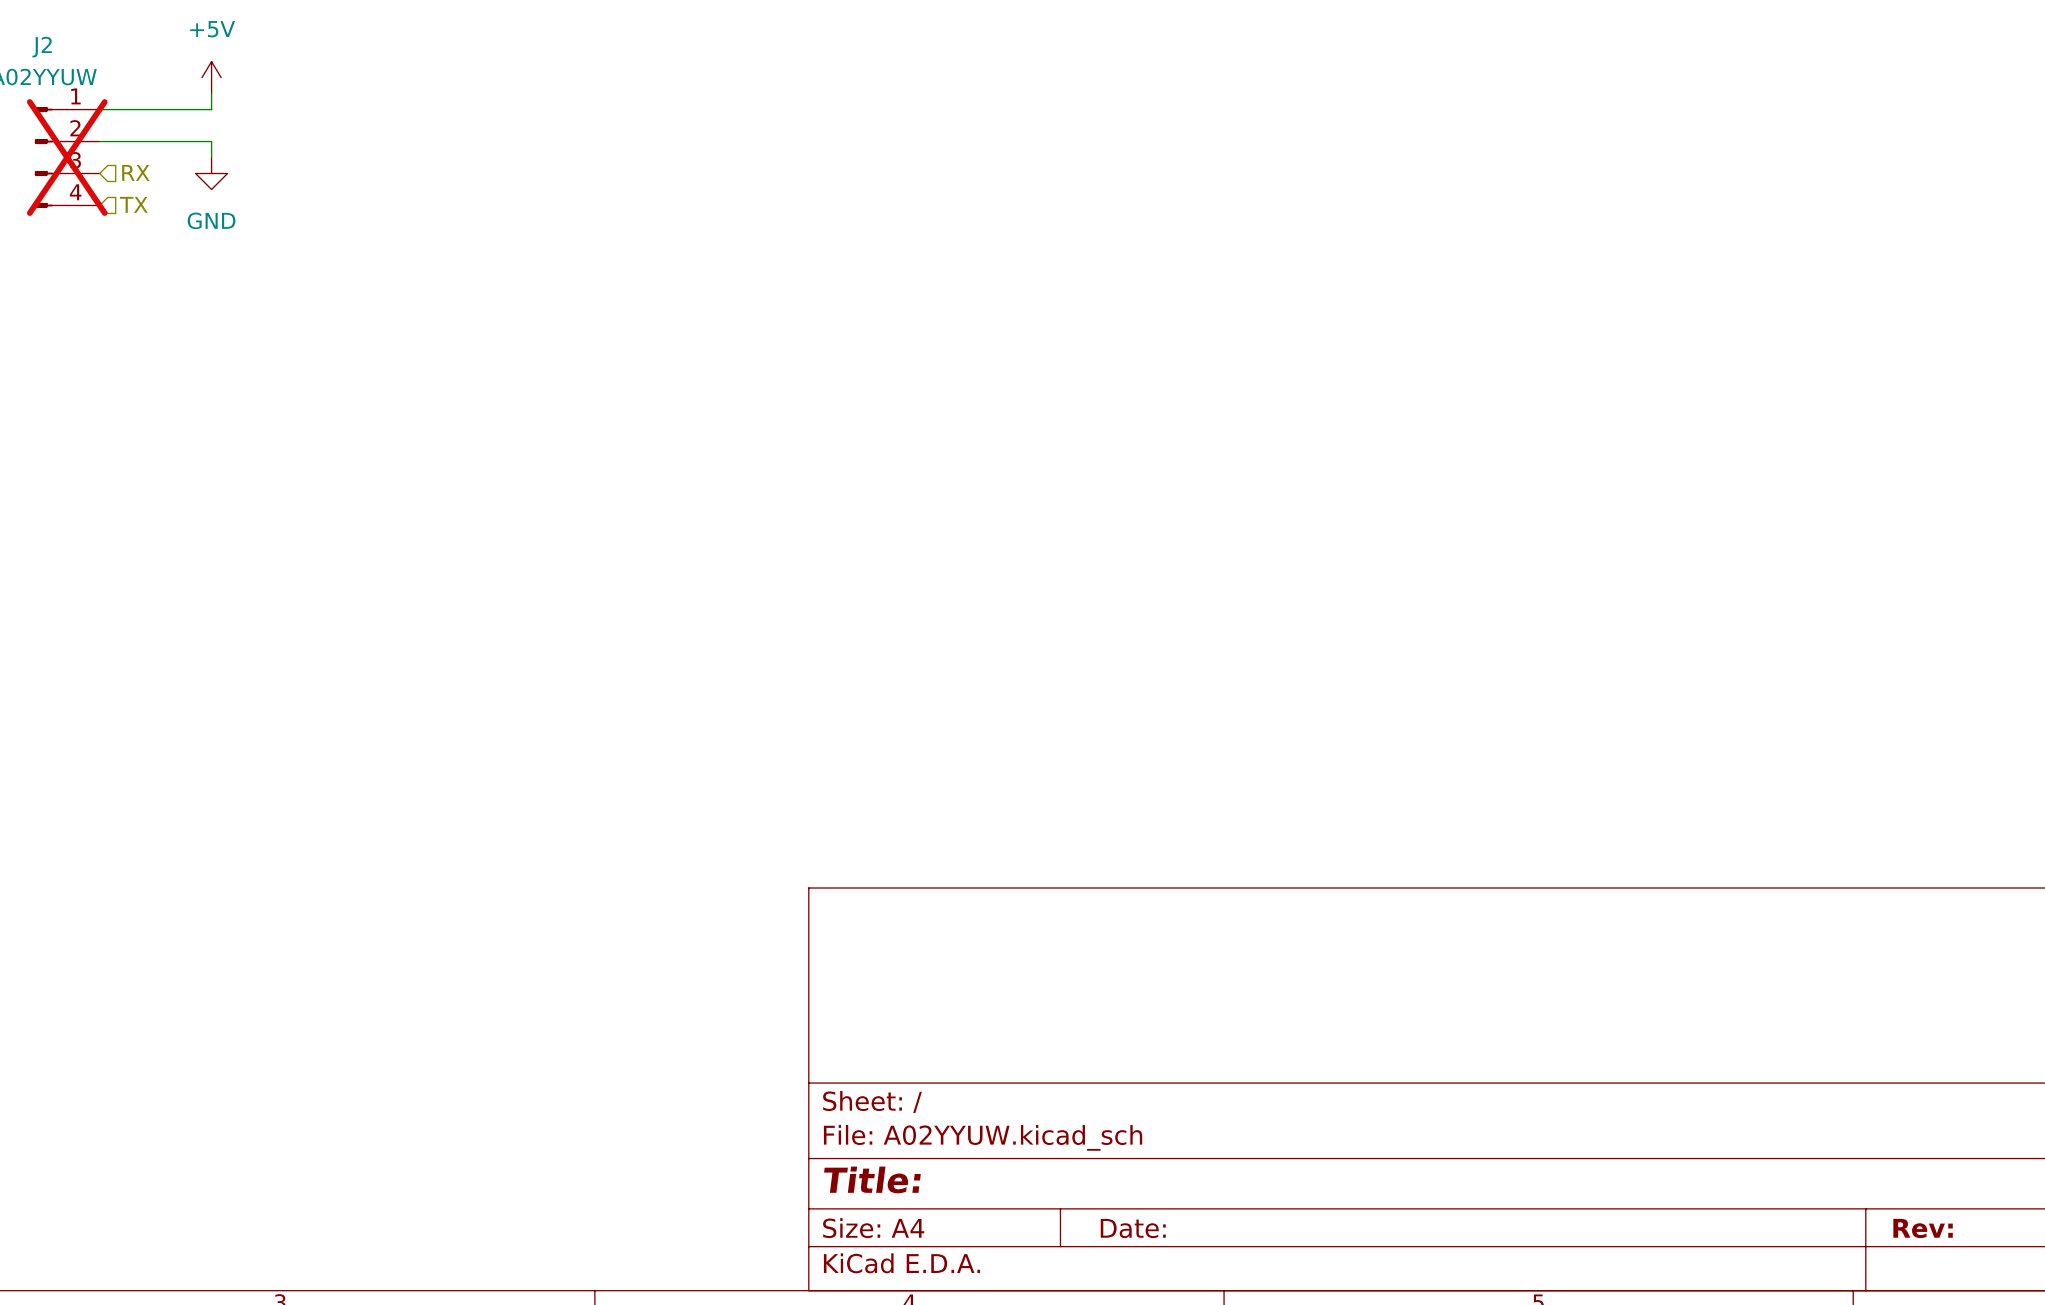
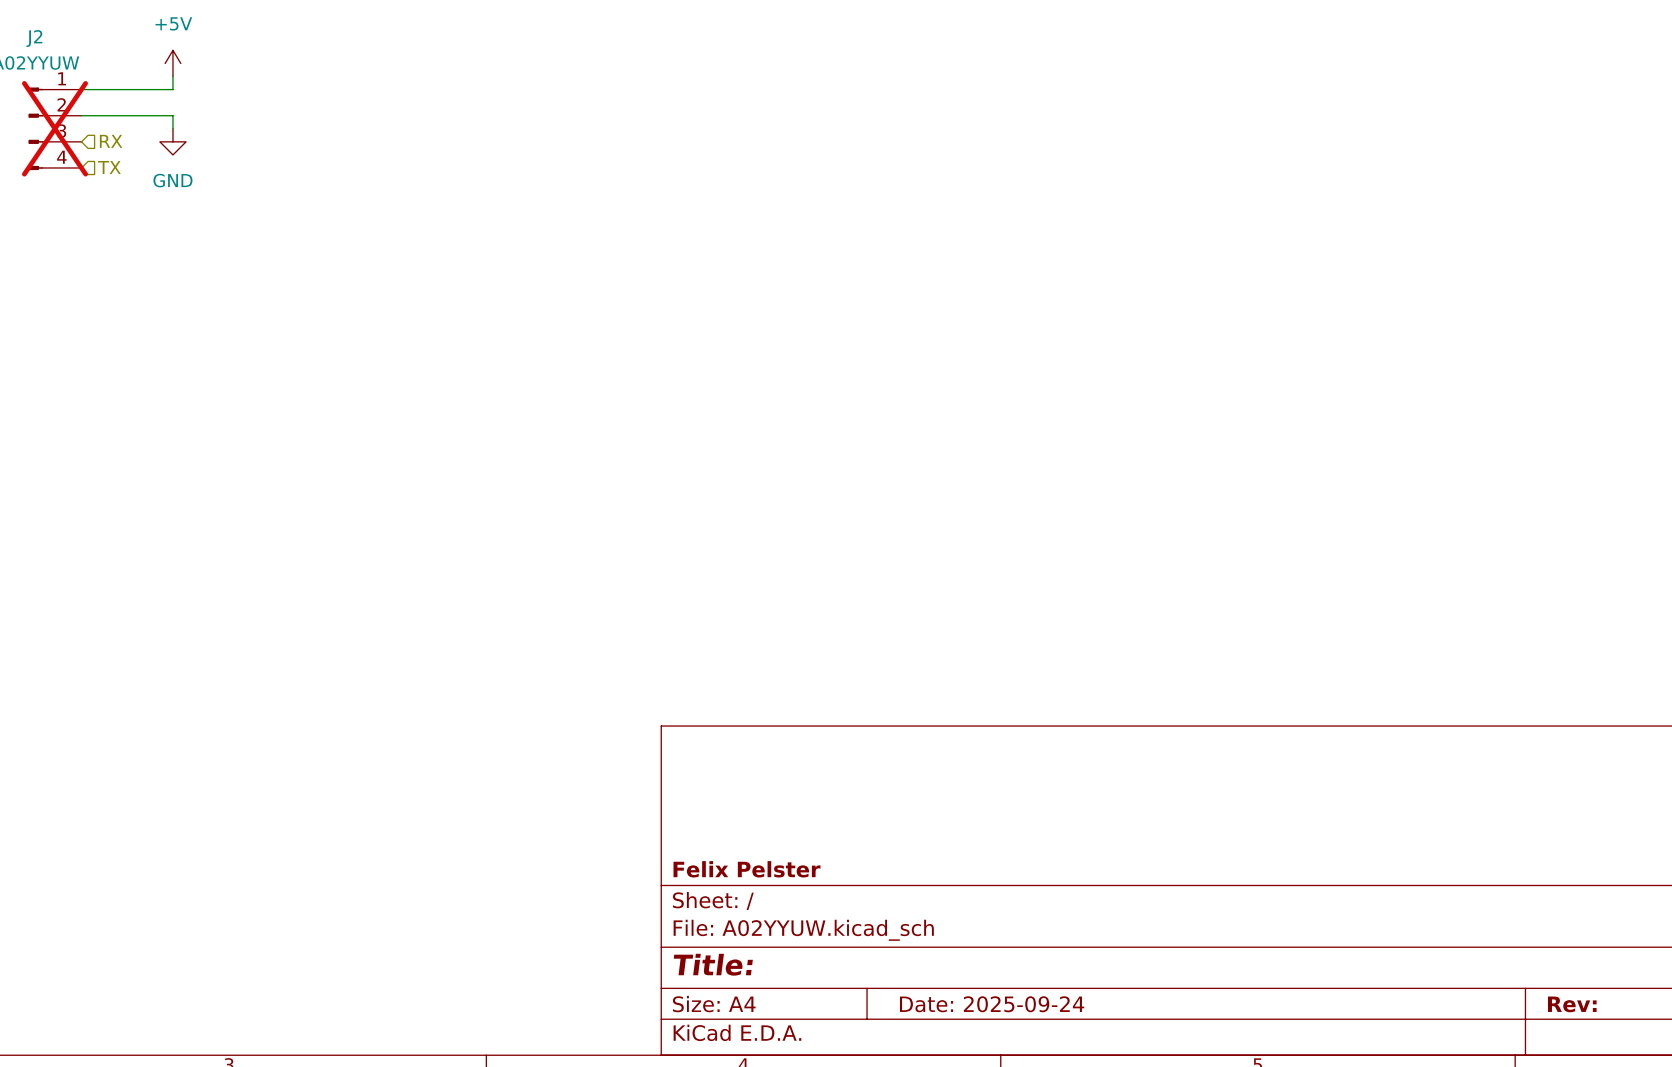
title block: none -> Felix Pelster (746, 869)
title block: Date: (1133, 1228) -> Date: 2025-09-24 (992, 1004)

